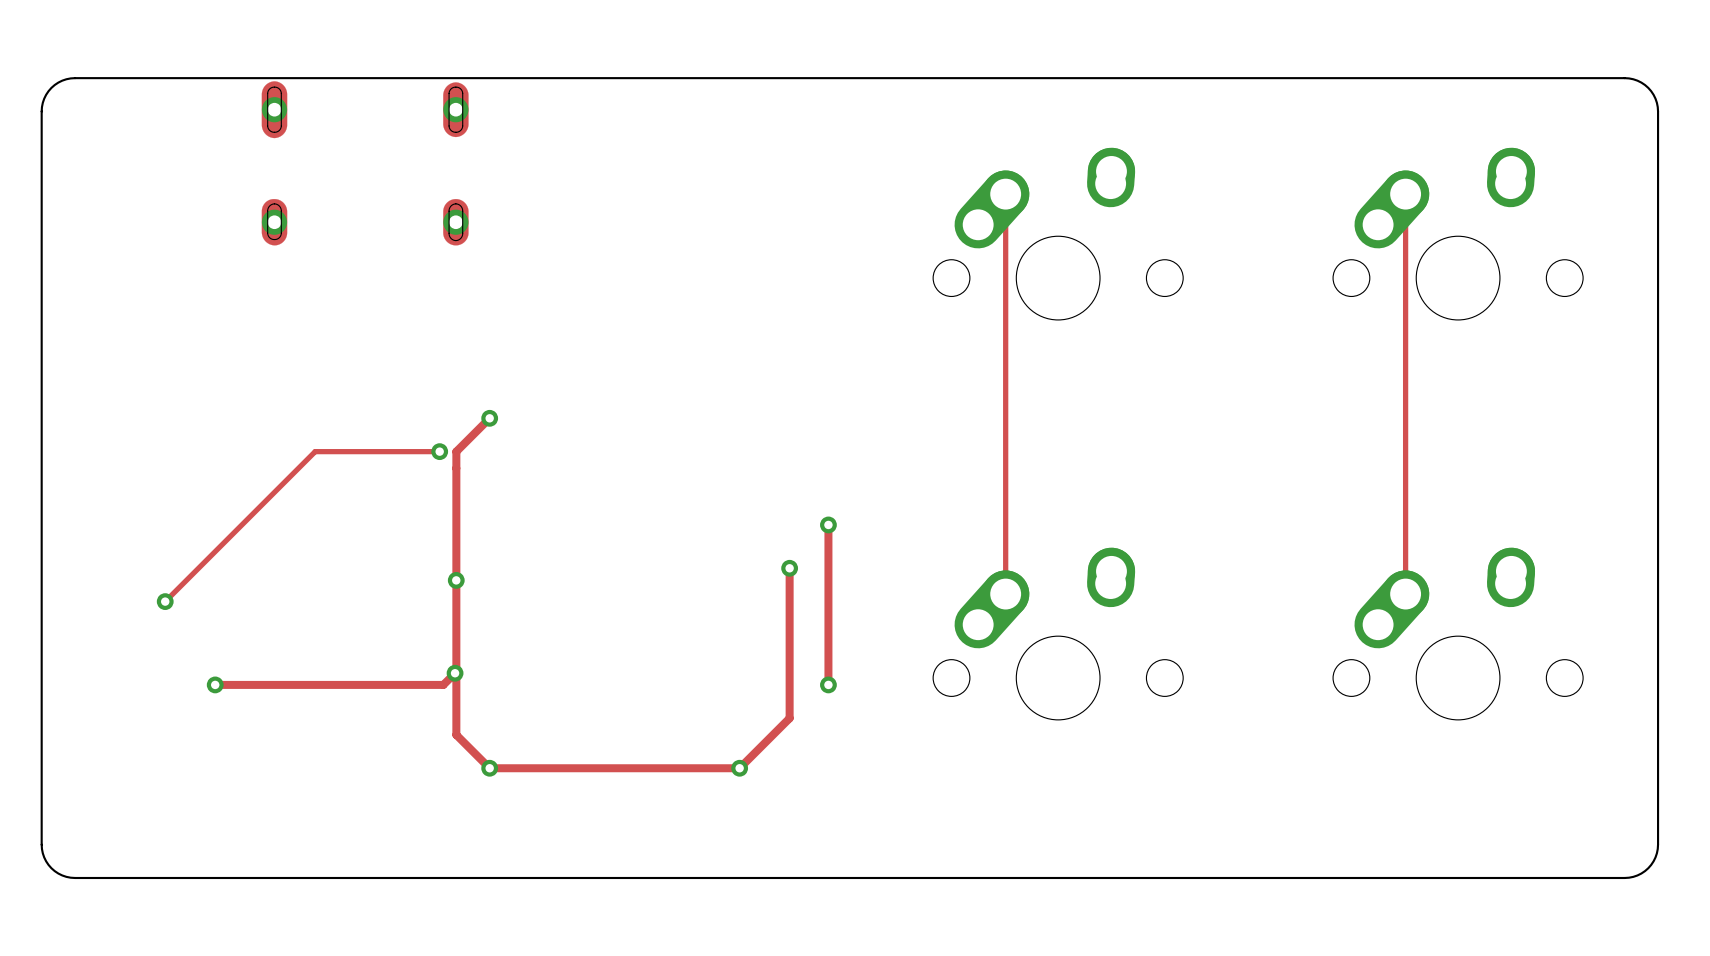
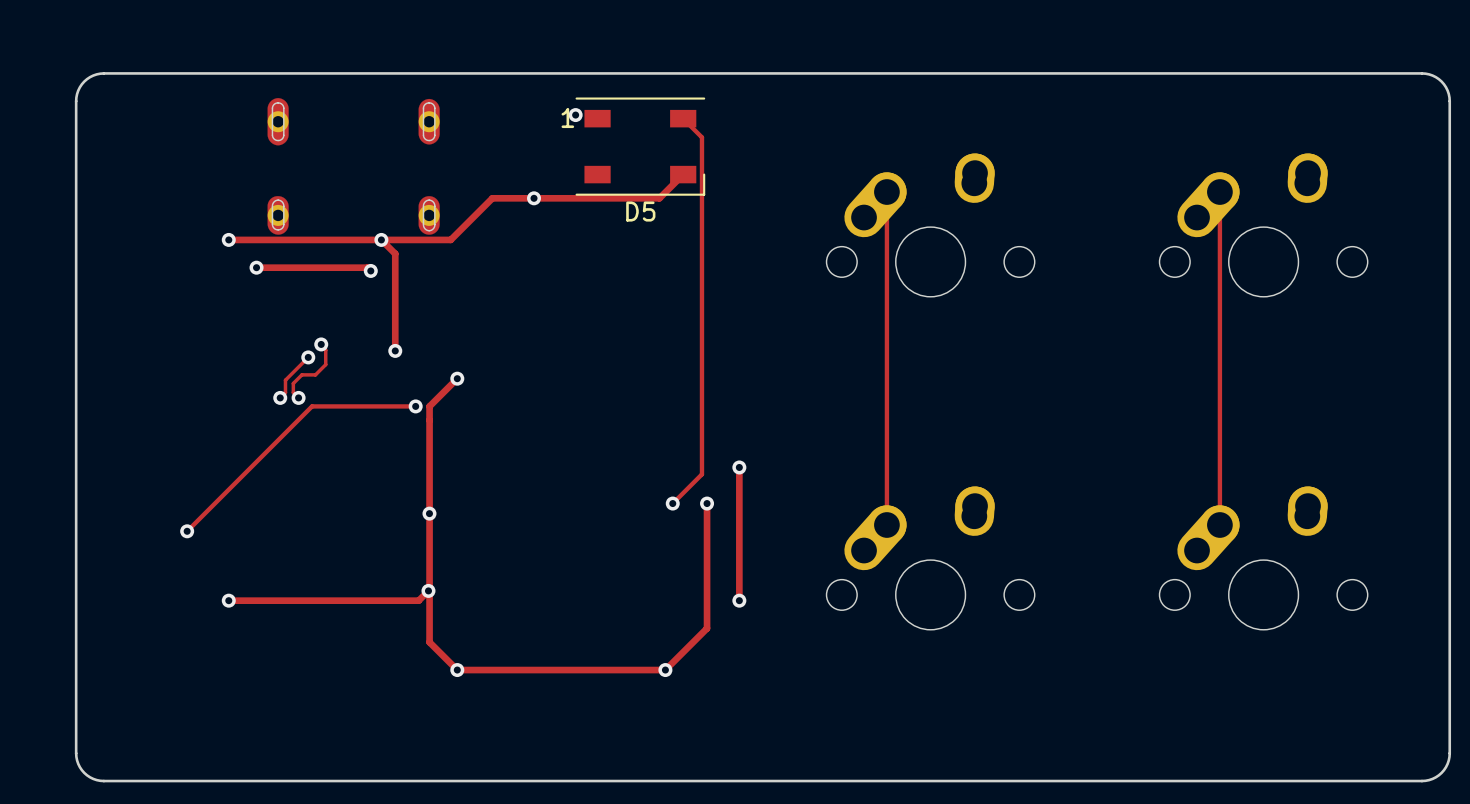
board edge: (75, 78) (1624, 78) (1641, 82) (1653, 94) (1658, 111) (1658, 844) (1653, 861) (1641, 873) (1624, 877) (75, 877) (58, 873) (46, 861) (41, 844) (41, 111) (44, 98) (51, 87) (62, 80) (75, 78) -> (103, 73) (93, 75) (84, 81) (78, 90) (76, 101) (76, 753) (79, 767) (90, 777) (103, 781) (1421, 781) (1435, 777) (1446, 767) (1449, 753) (1449, 101) (1446, 87) (1435, 77) (1421, 73) (103, 73)
via: none -> (575, 115)
track: none -> (683, 118) (701, 137) (701, 474) (672, 503)
D5: none -> (640, 146)
track: none -> (683, 174) (659, 198) (492, 198) (450, 239) (228, 239)
via: none -> (534, 198)
via: none -> (228, 239)
track: none -> (381, 239) (395, 253) (395, 350)
via: none -> (381, 239)
track: none -> (256, 267) (367, 267) (370, 270)
via: none -> (256, 267)
via: none -> (370, 270)
track: none -> (321, 344) (325, 350) (325, 364) (315, 374) (301, 374) (293, 383) (293, 392) (298, 397)
via: none -> (321, 344)
via: none -> (395, 350)
track: none -> (308, 357) (285, 380) (285, 392) (280, 397)
via: none -> (308, 357)
via: none -> (280, 397)
via: none -> (298, 397)
via: none -> (672, 503)

